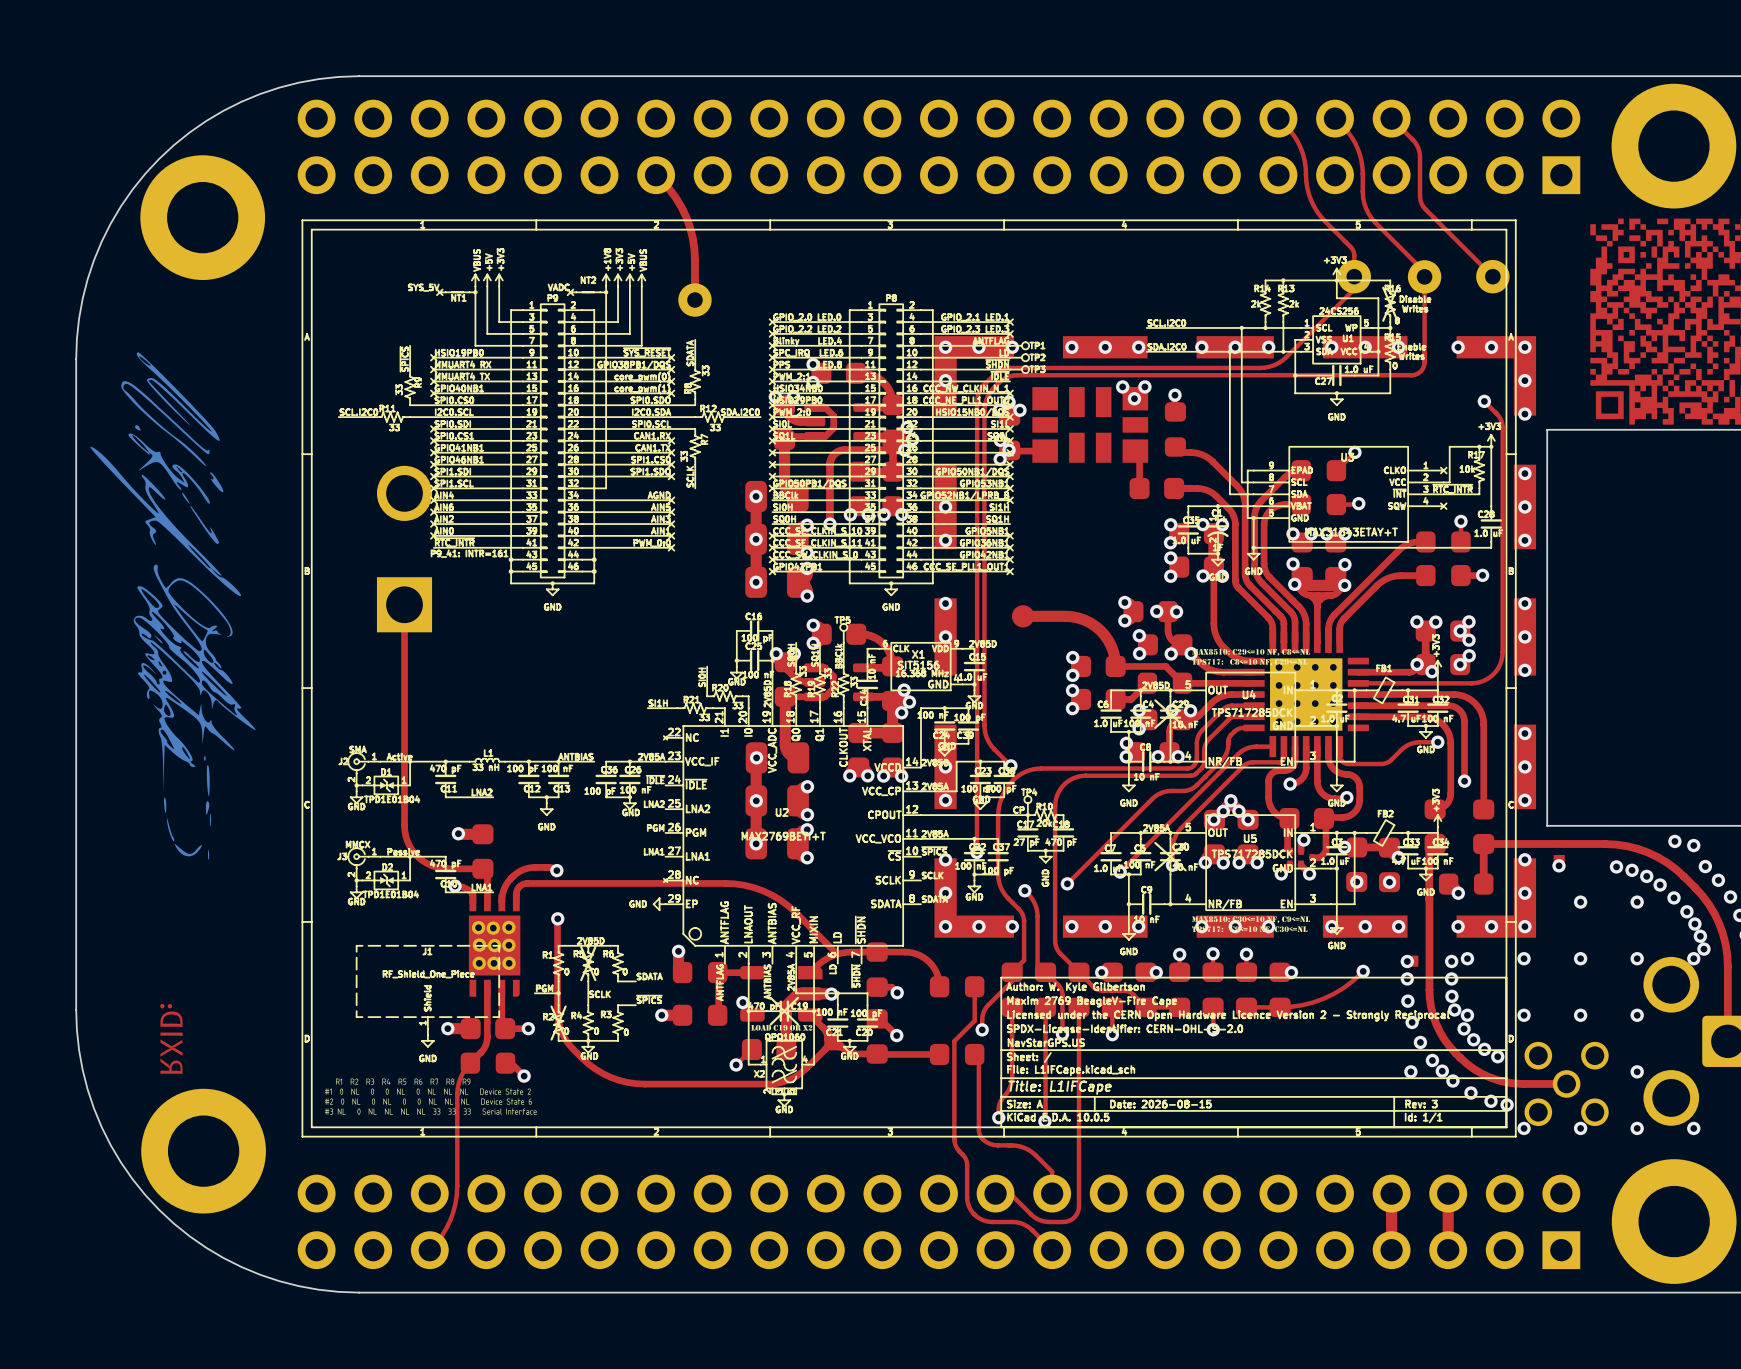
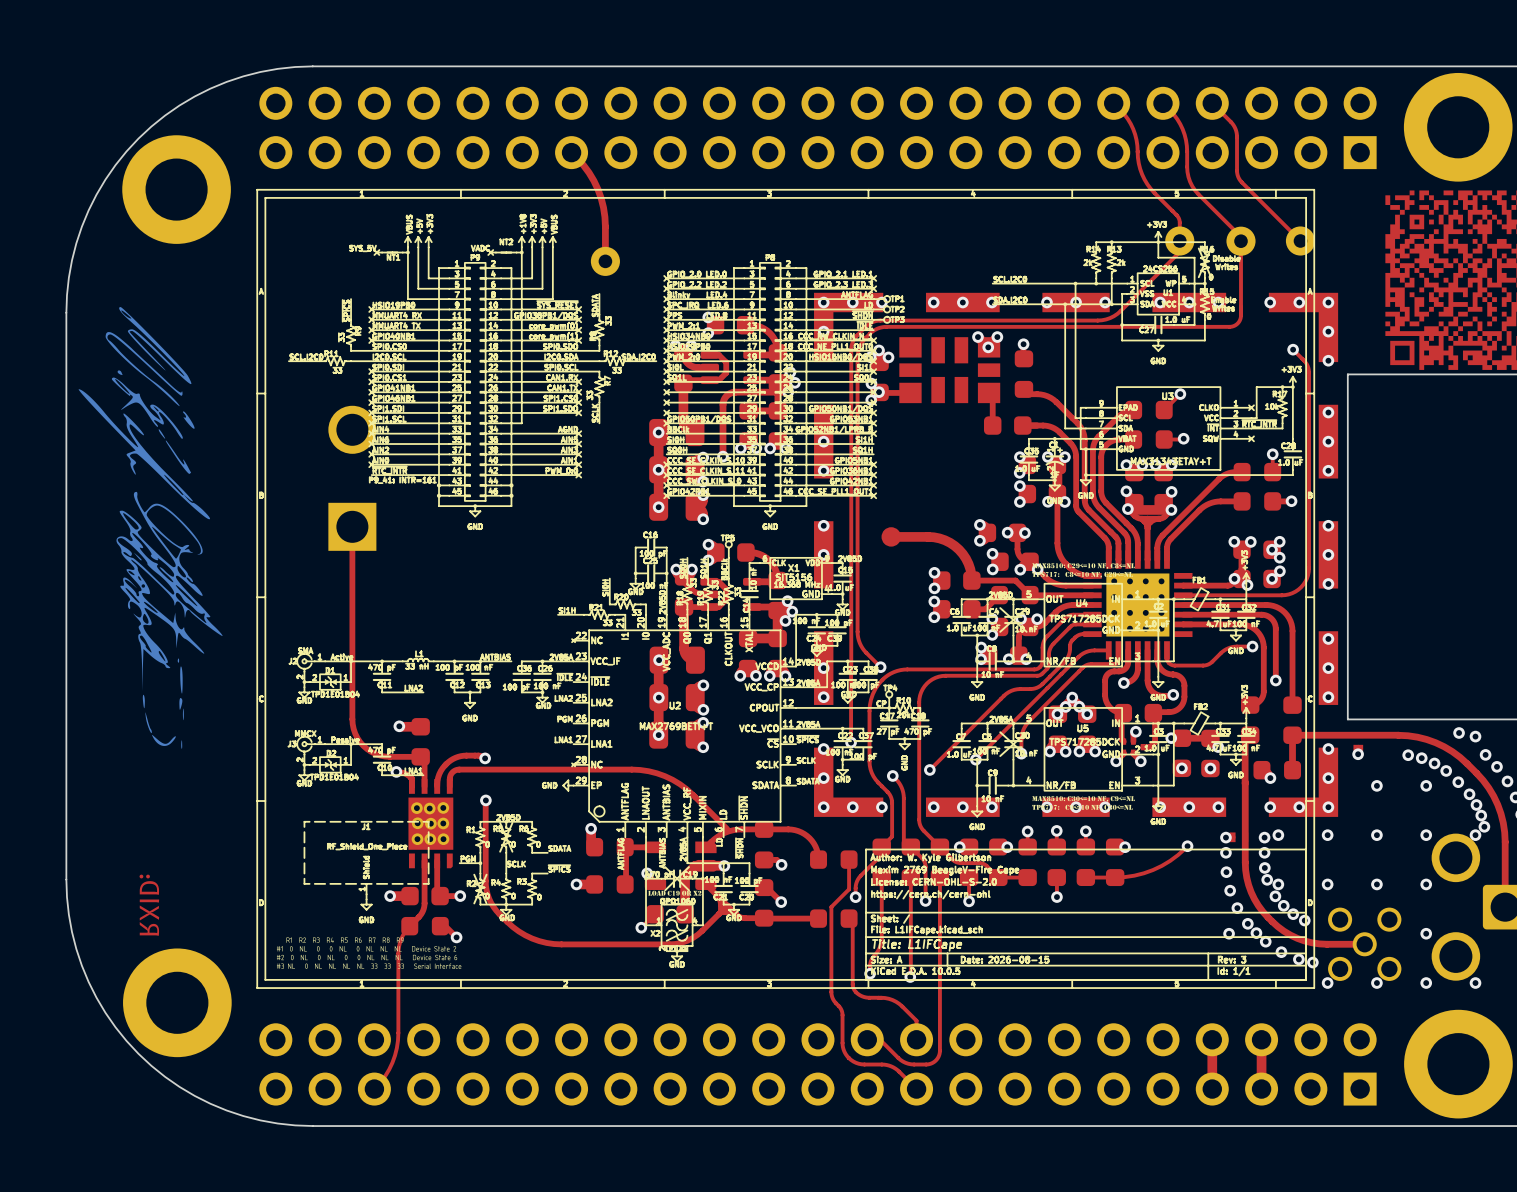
drawing shape: [302, 219, 1517, 1138] -> [256, 189, 1315, 989]

